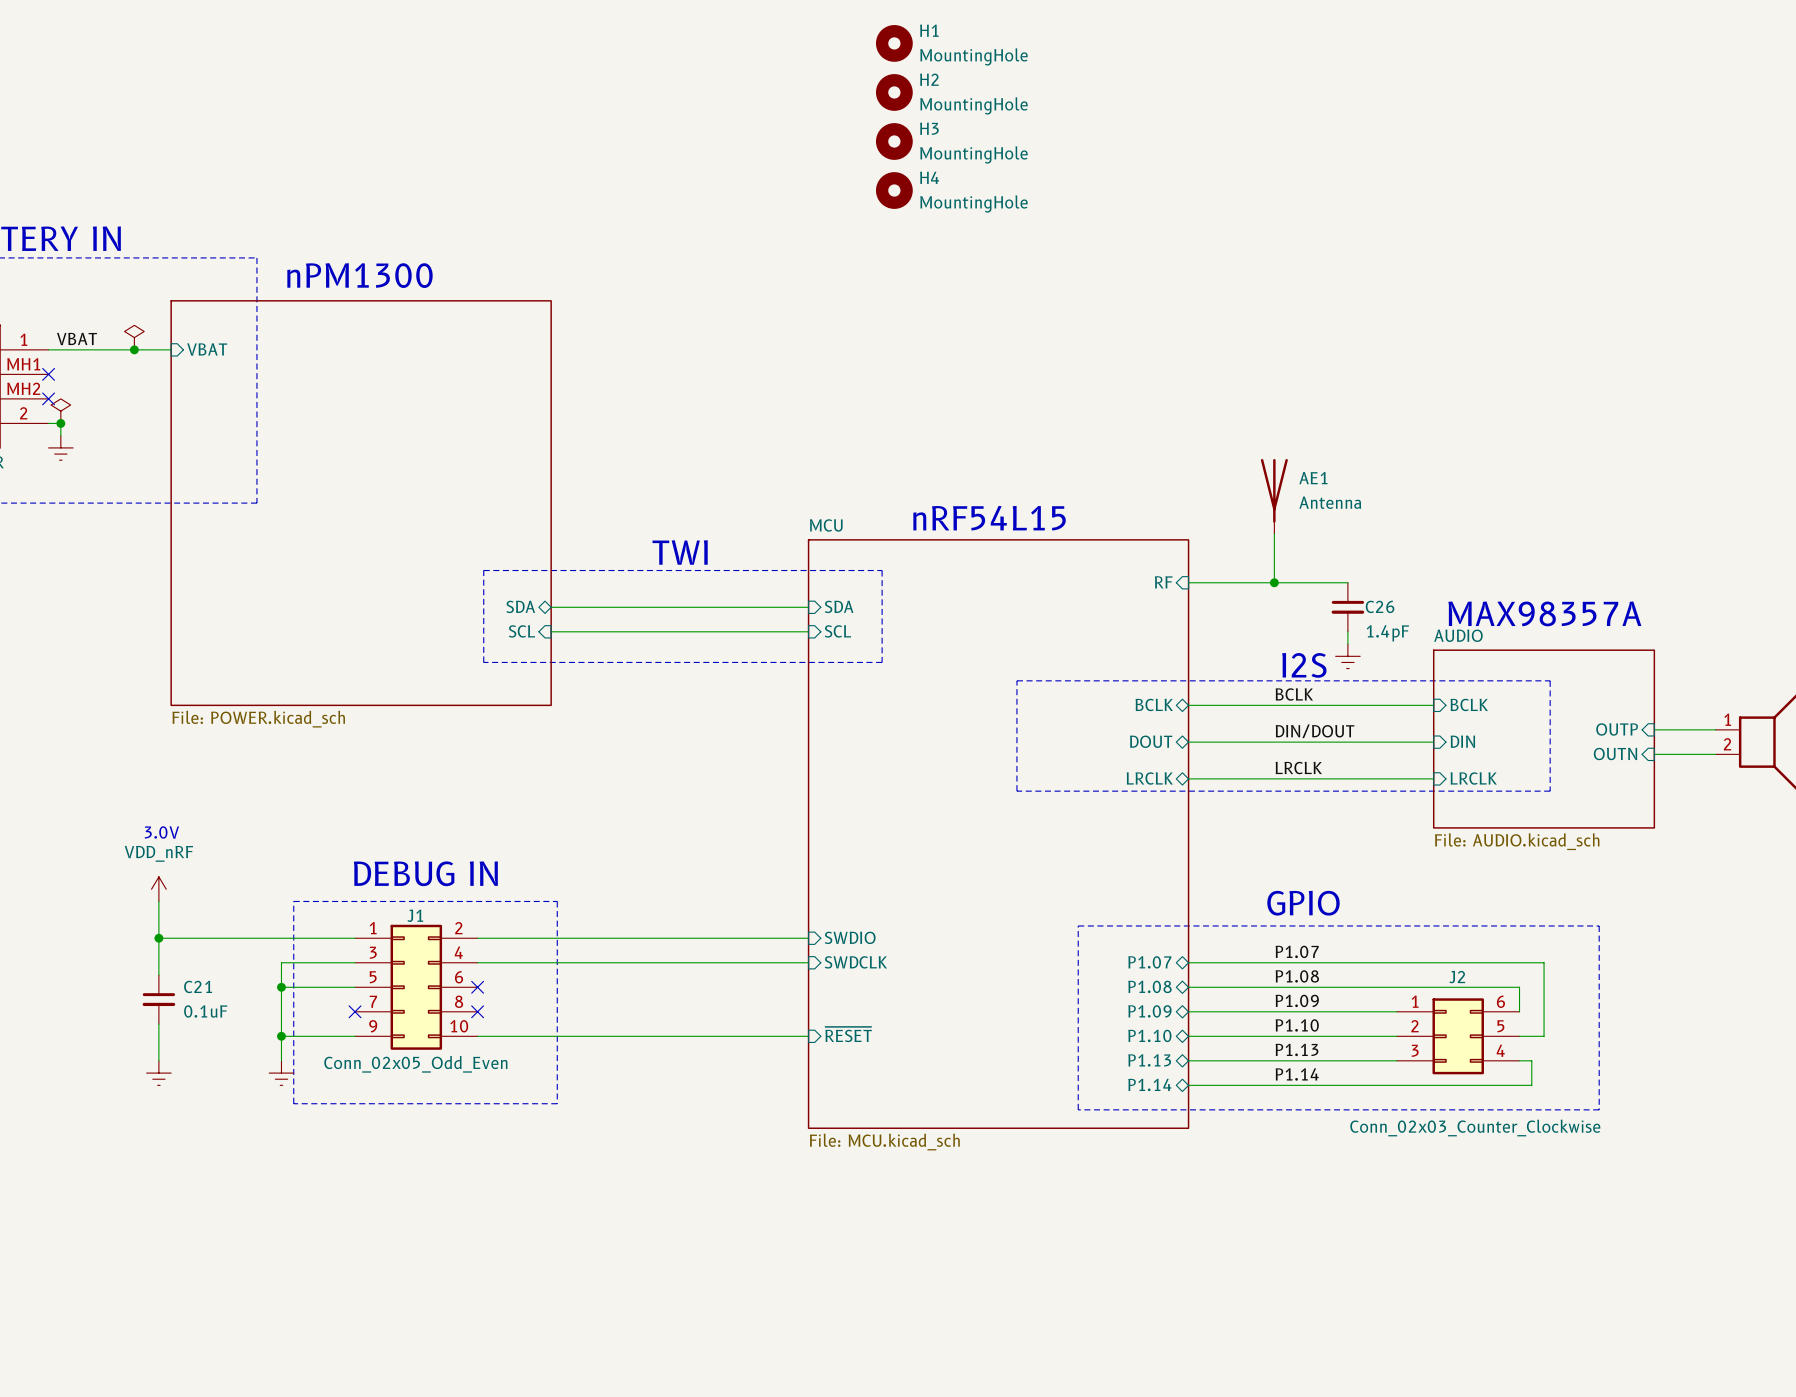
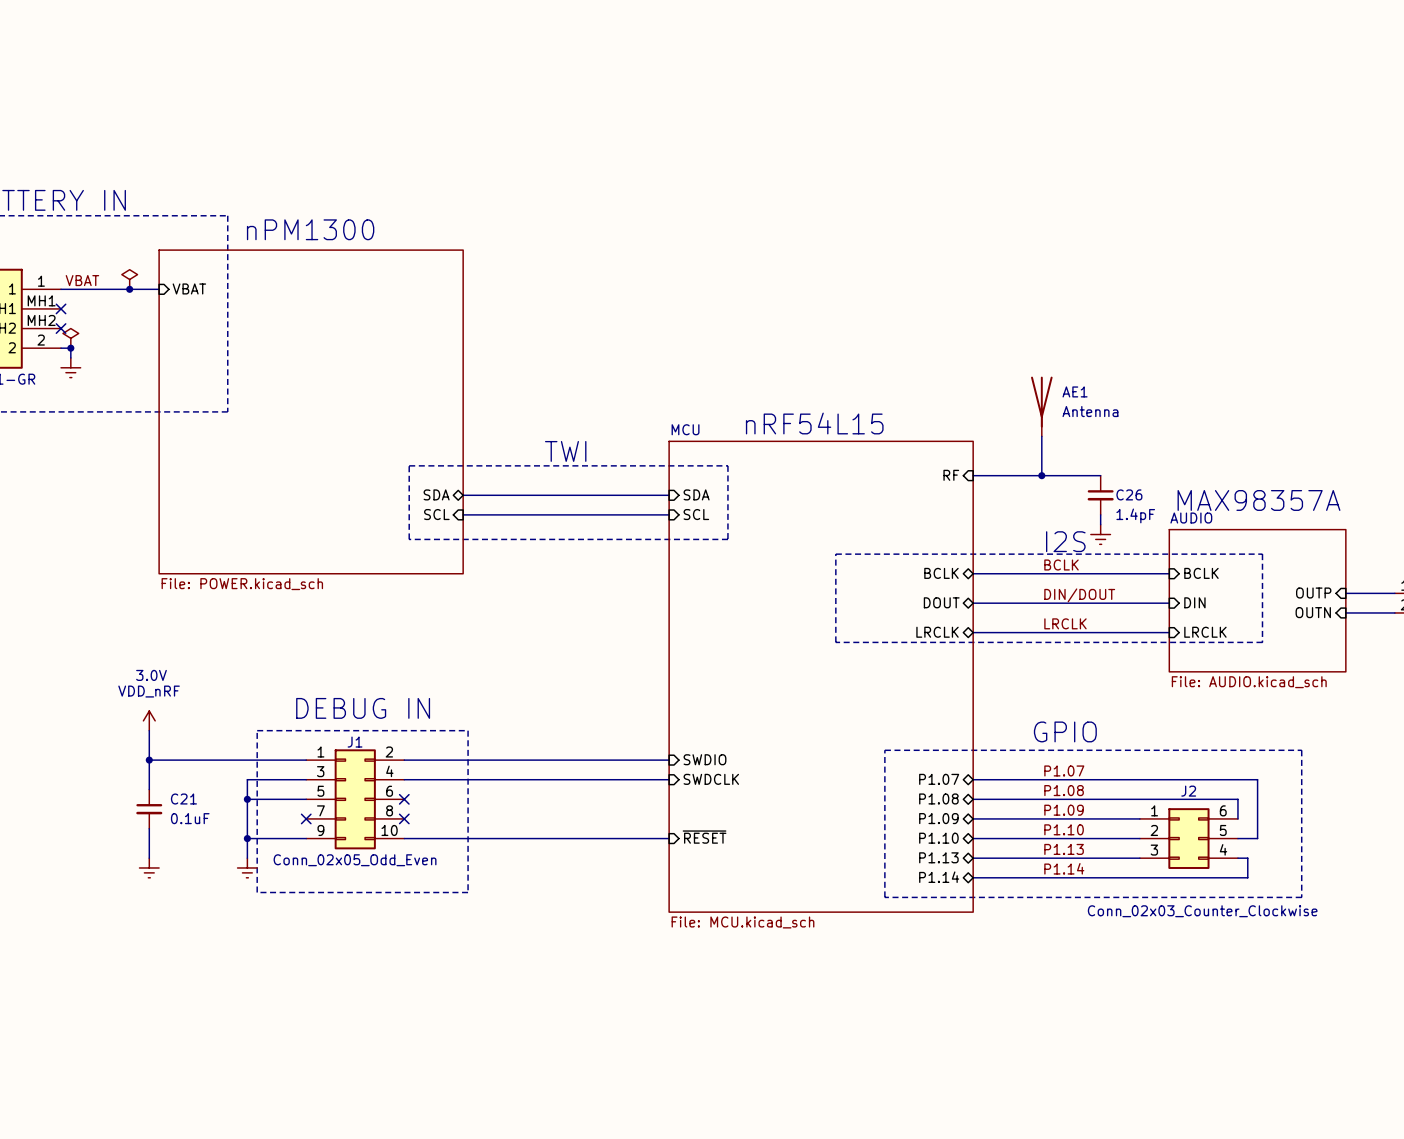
H1: MountingHole (894, 43) -> none
H2: MountingHole (894, 92) -> none
H3: MountingHole (894, 141) -> none
H4: MountingHole (894, 190) -> none

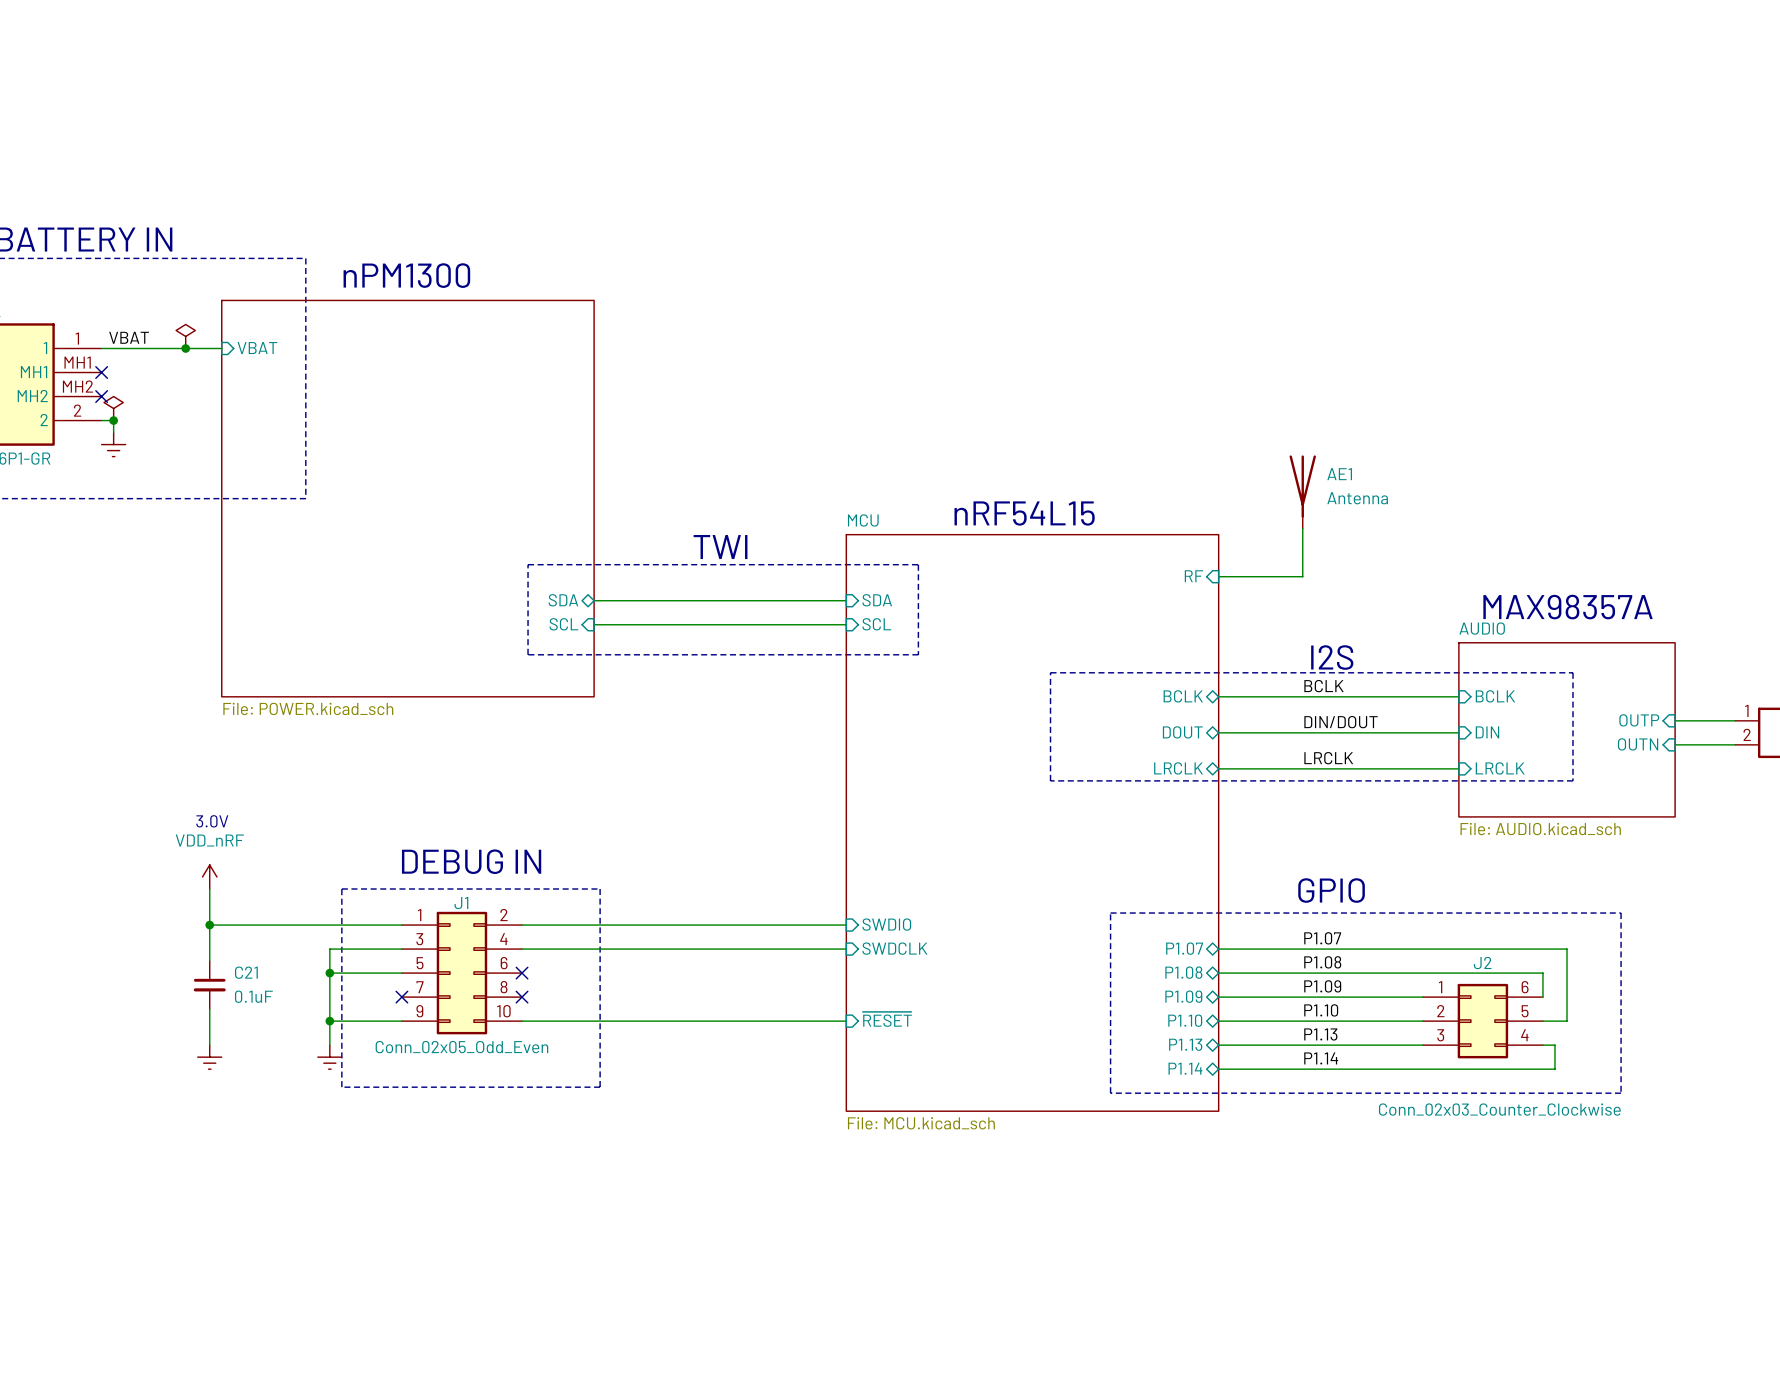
wire: (1041, 475) (1100, 475) -> none
junction: (1041, 475) -> none
C26: 1.4pF (1100, 495) -> none
wire: (1100, 514) (1100, 524) -> none
power symbol: (1100, 534) -> none

